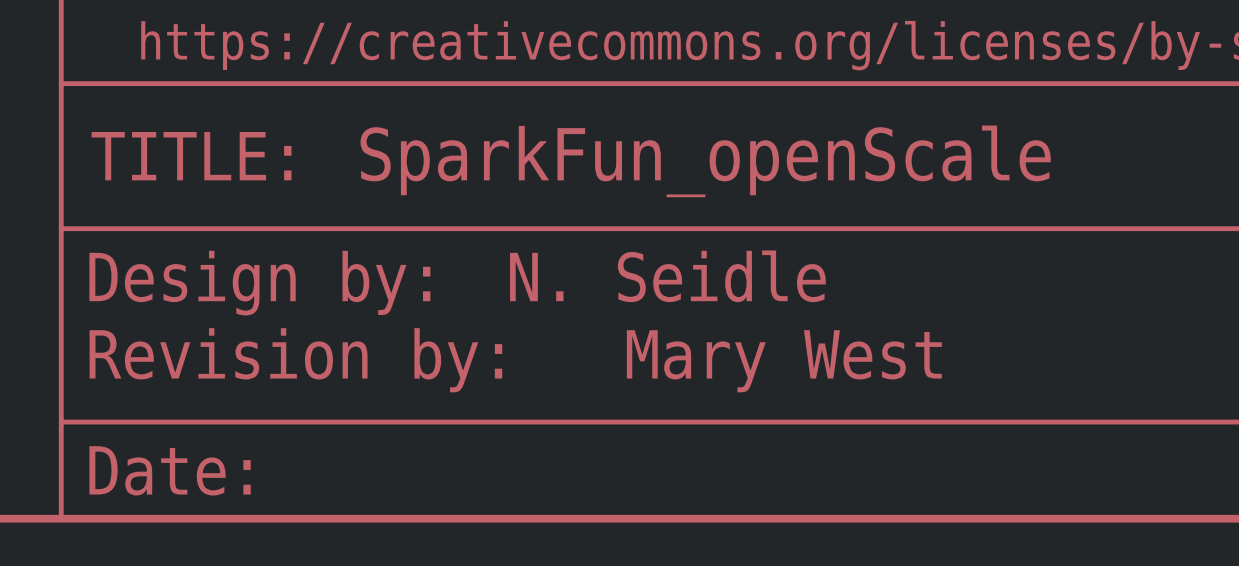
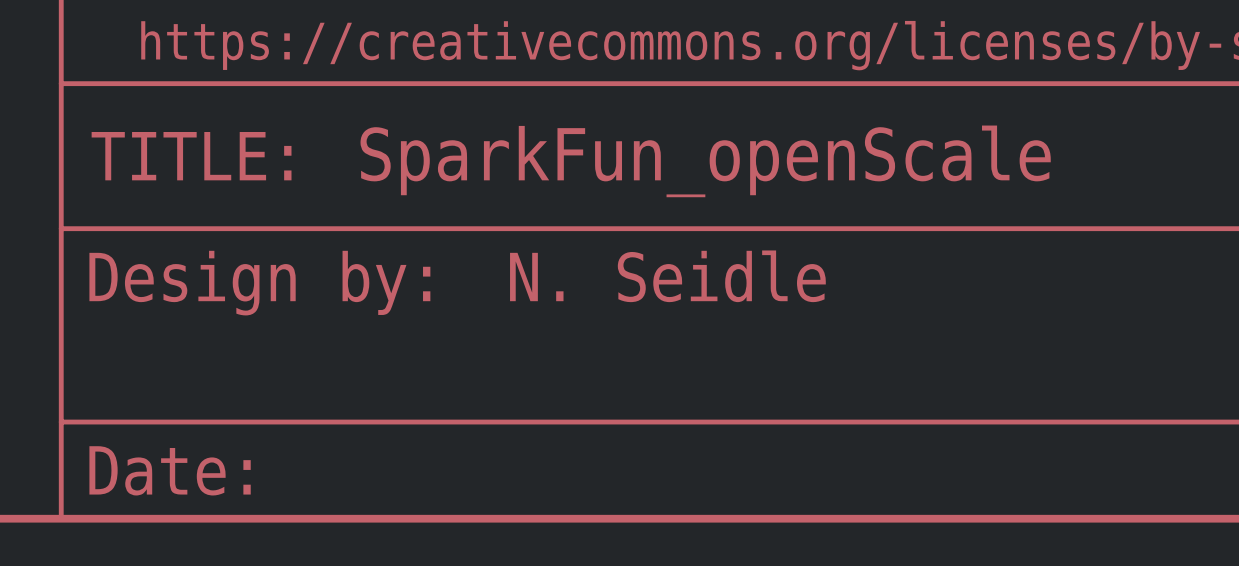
text: Revision by: Mary West (515, 360) -> none

